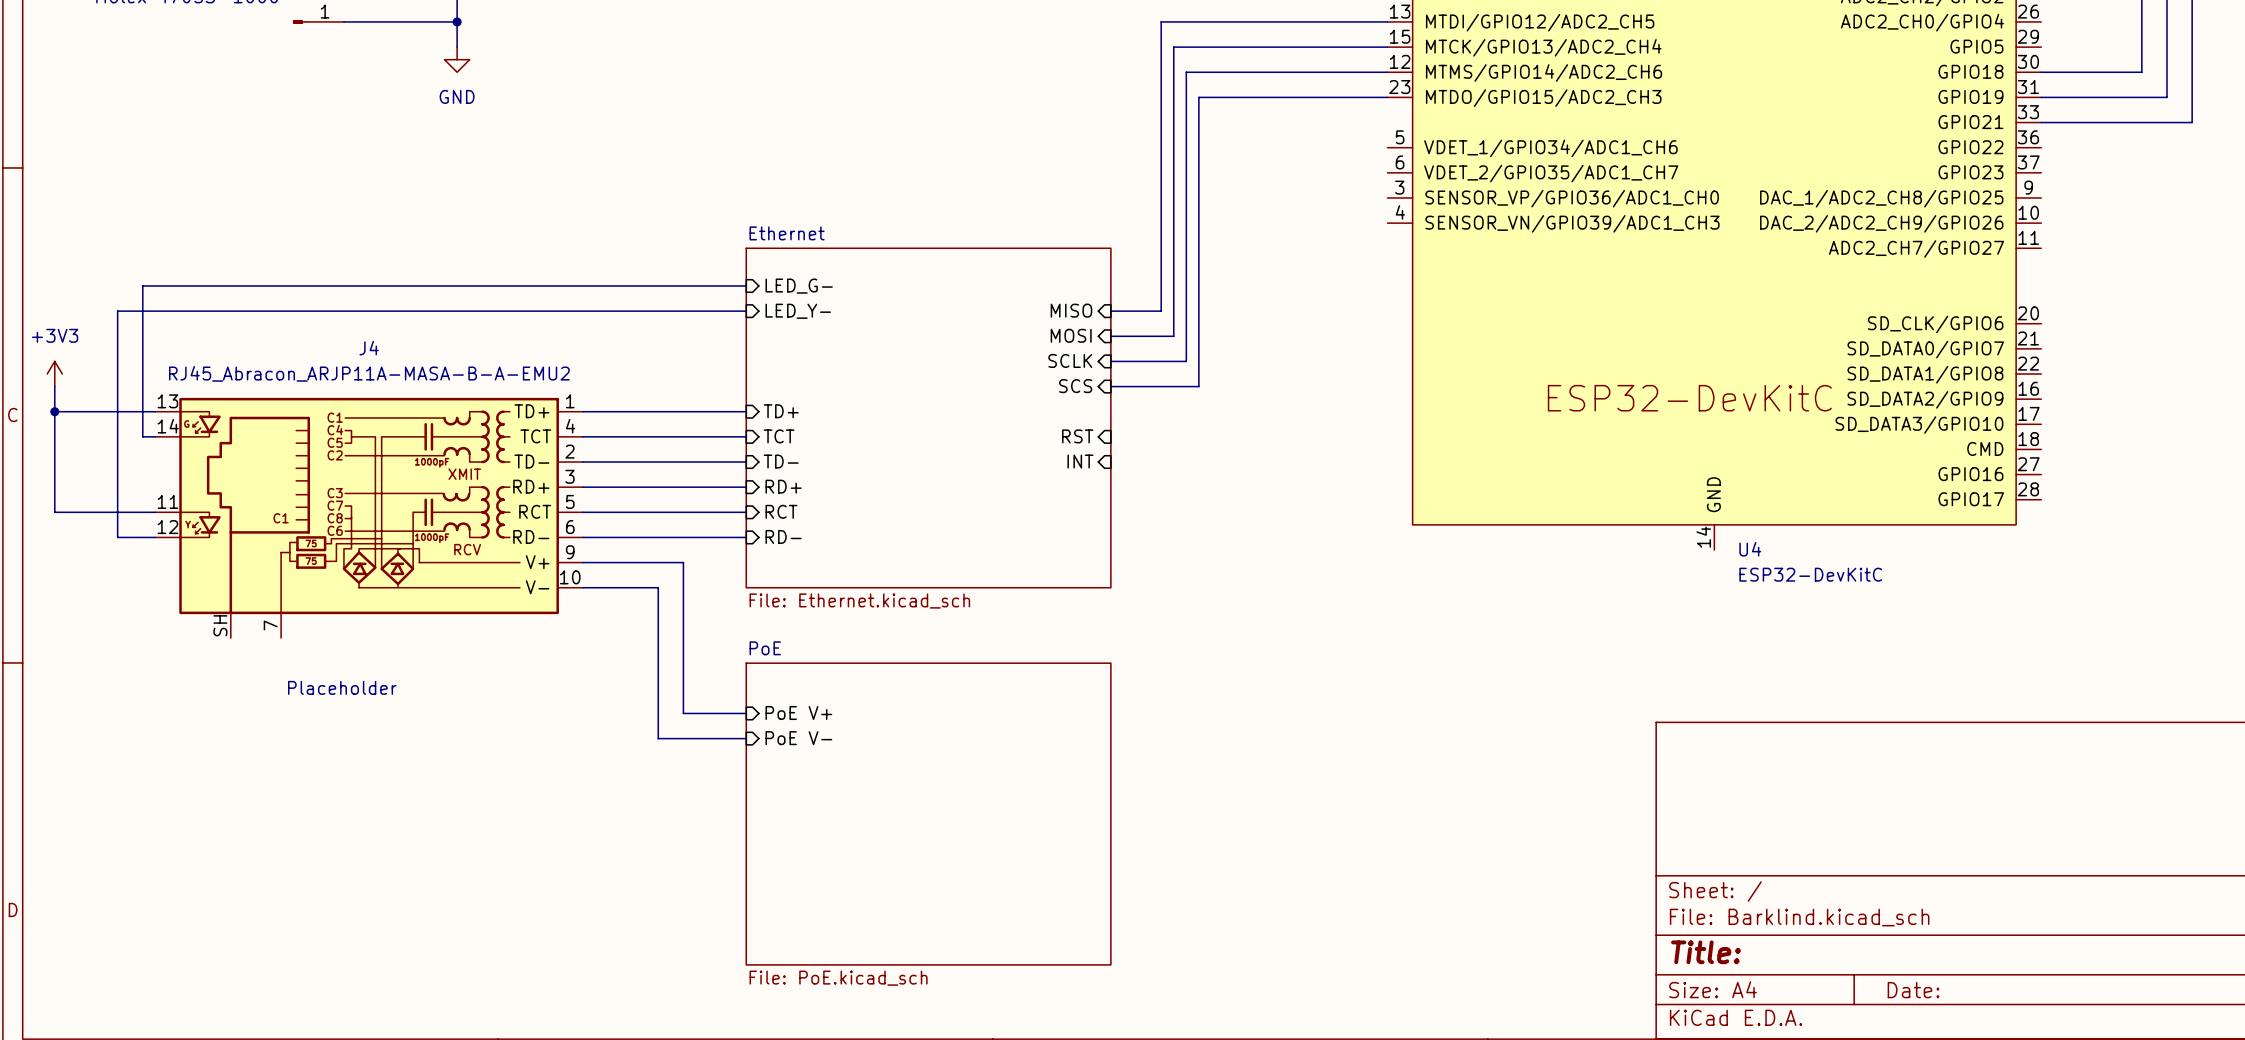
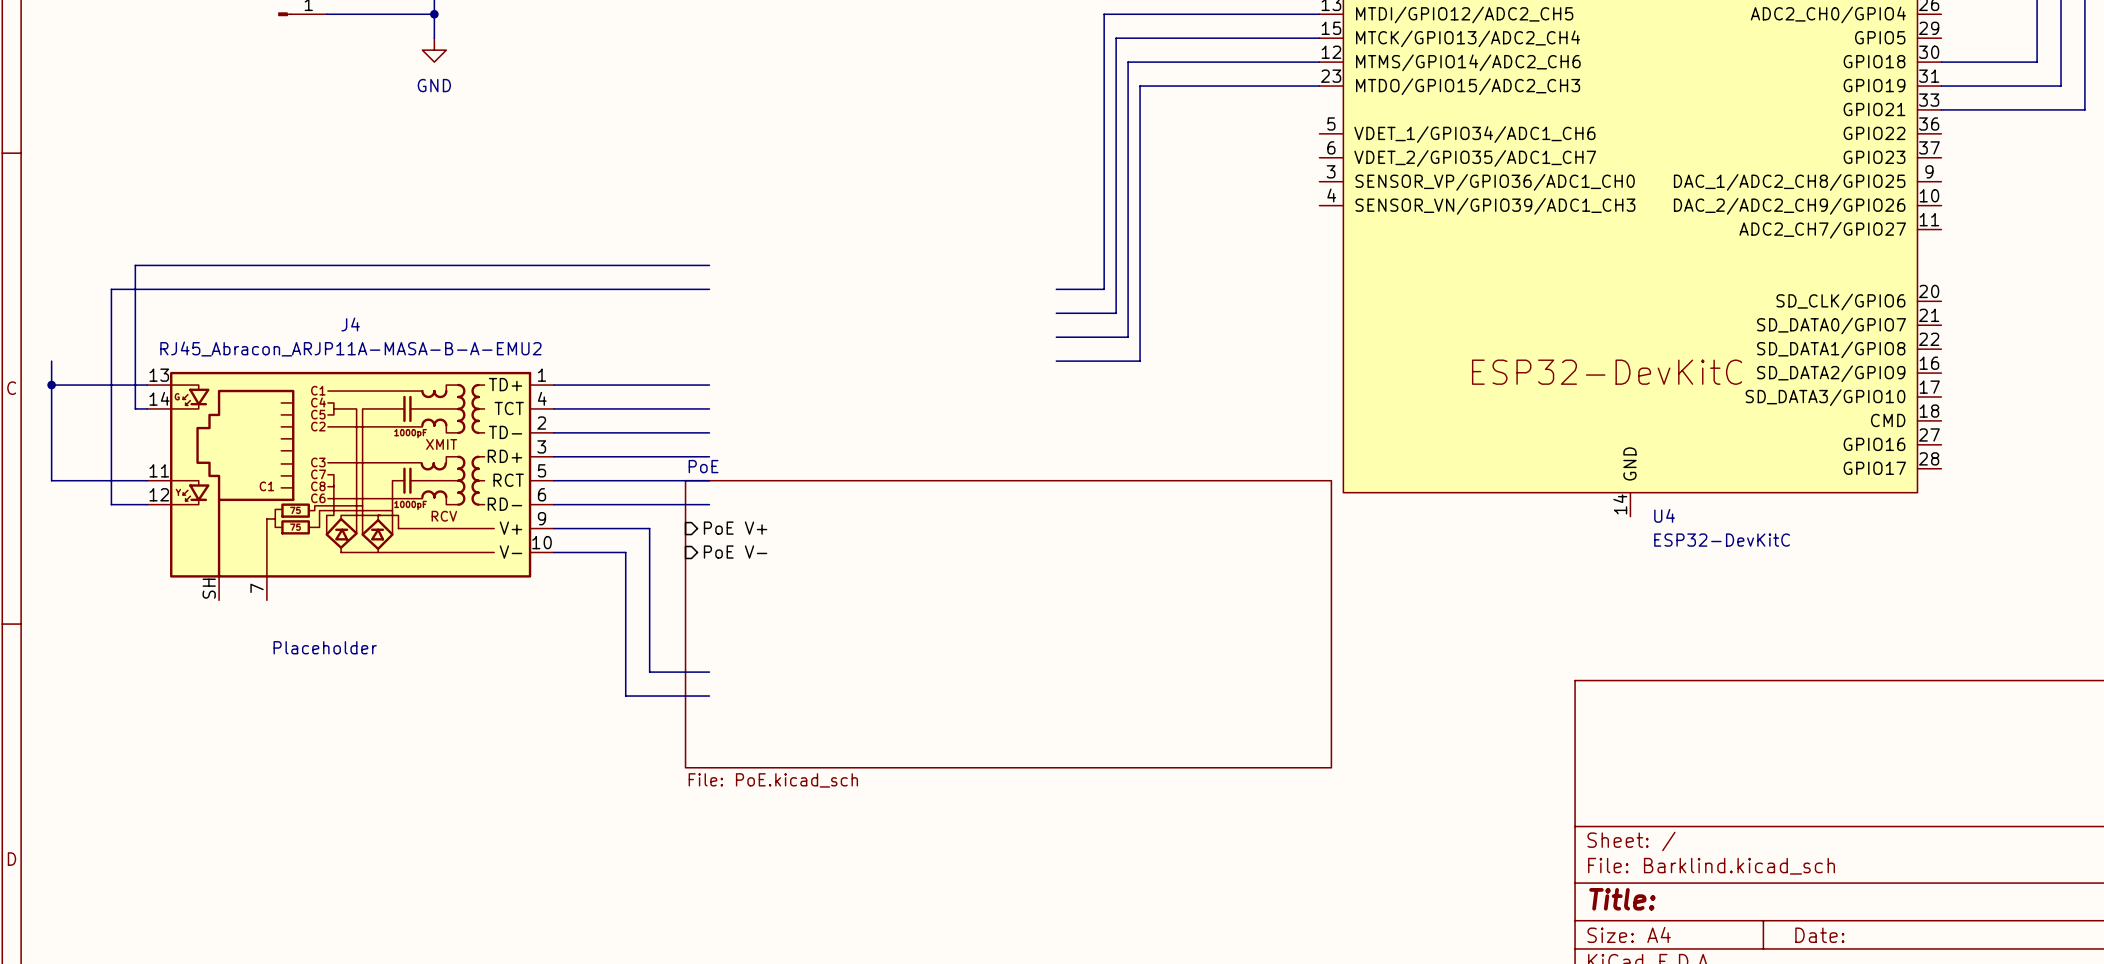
sheet pin: LED_G- (799, 286) -> none
sheet pin: MISO (1071, 310) -> none
sheet pin: LED_Y- (798, 311) -> none
sheet pin: MOSI (1071, 335) -> none
sheet pin: SCLK (1070, 360) -> none
power symbol: +3V3 (54, 374) -> none
sheet pin: SCS (1075, 386) -> none
sheet pin: TD+ (781, 411) -> none
sheet Ethernet: File: Ethernet.kicad_sch (928, 418) -> none
sheet pin: TCT (779, 436) -> none
sheet pin: RST (1077, 436) -> none
sheet pin: TD- (781, 461) -> none
sheet pin: INT (1080, 461) -> none
sheet pin: RD+ (783, 486) -> none
sheet pin: RCT (781, 511) -> none
sheet pin: RD- (783, 536) -> none
sheet PoE: none -> File: PoE.kicad_sch (1008, 624)
sheet pin position: PoE V+ (798, 712) -> PoE V+ (735, 528)
sheet pin position: PoE V- (798, 738) -> PoE V- (735, 552)
sheet PoE: File: PoE.kicad_sch (928, 814) -> none

